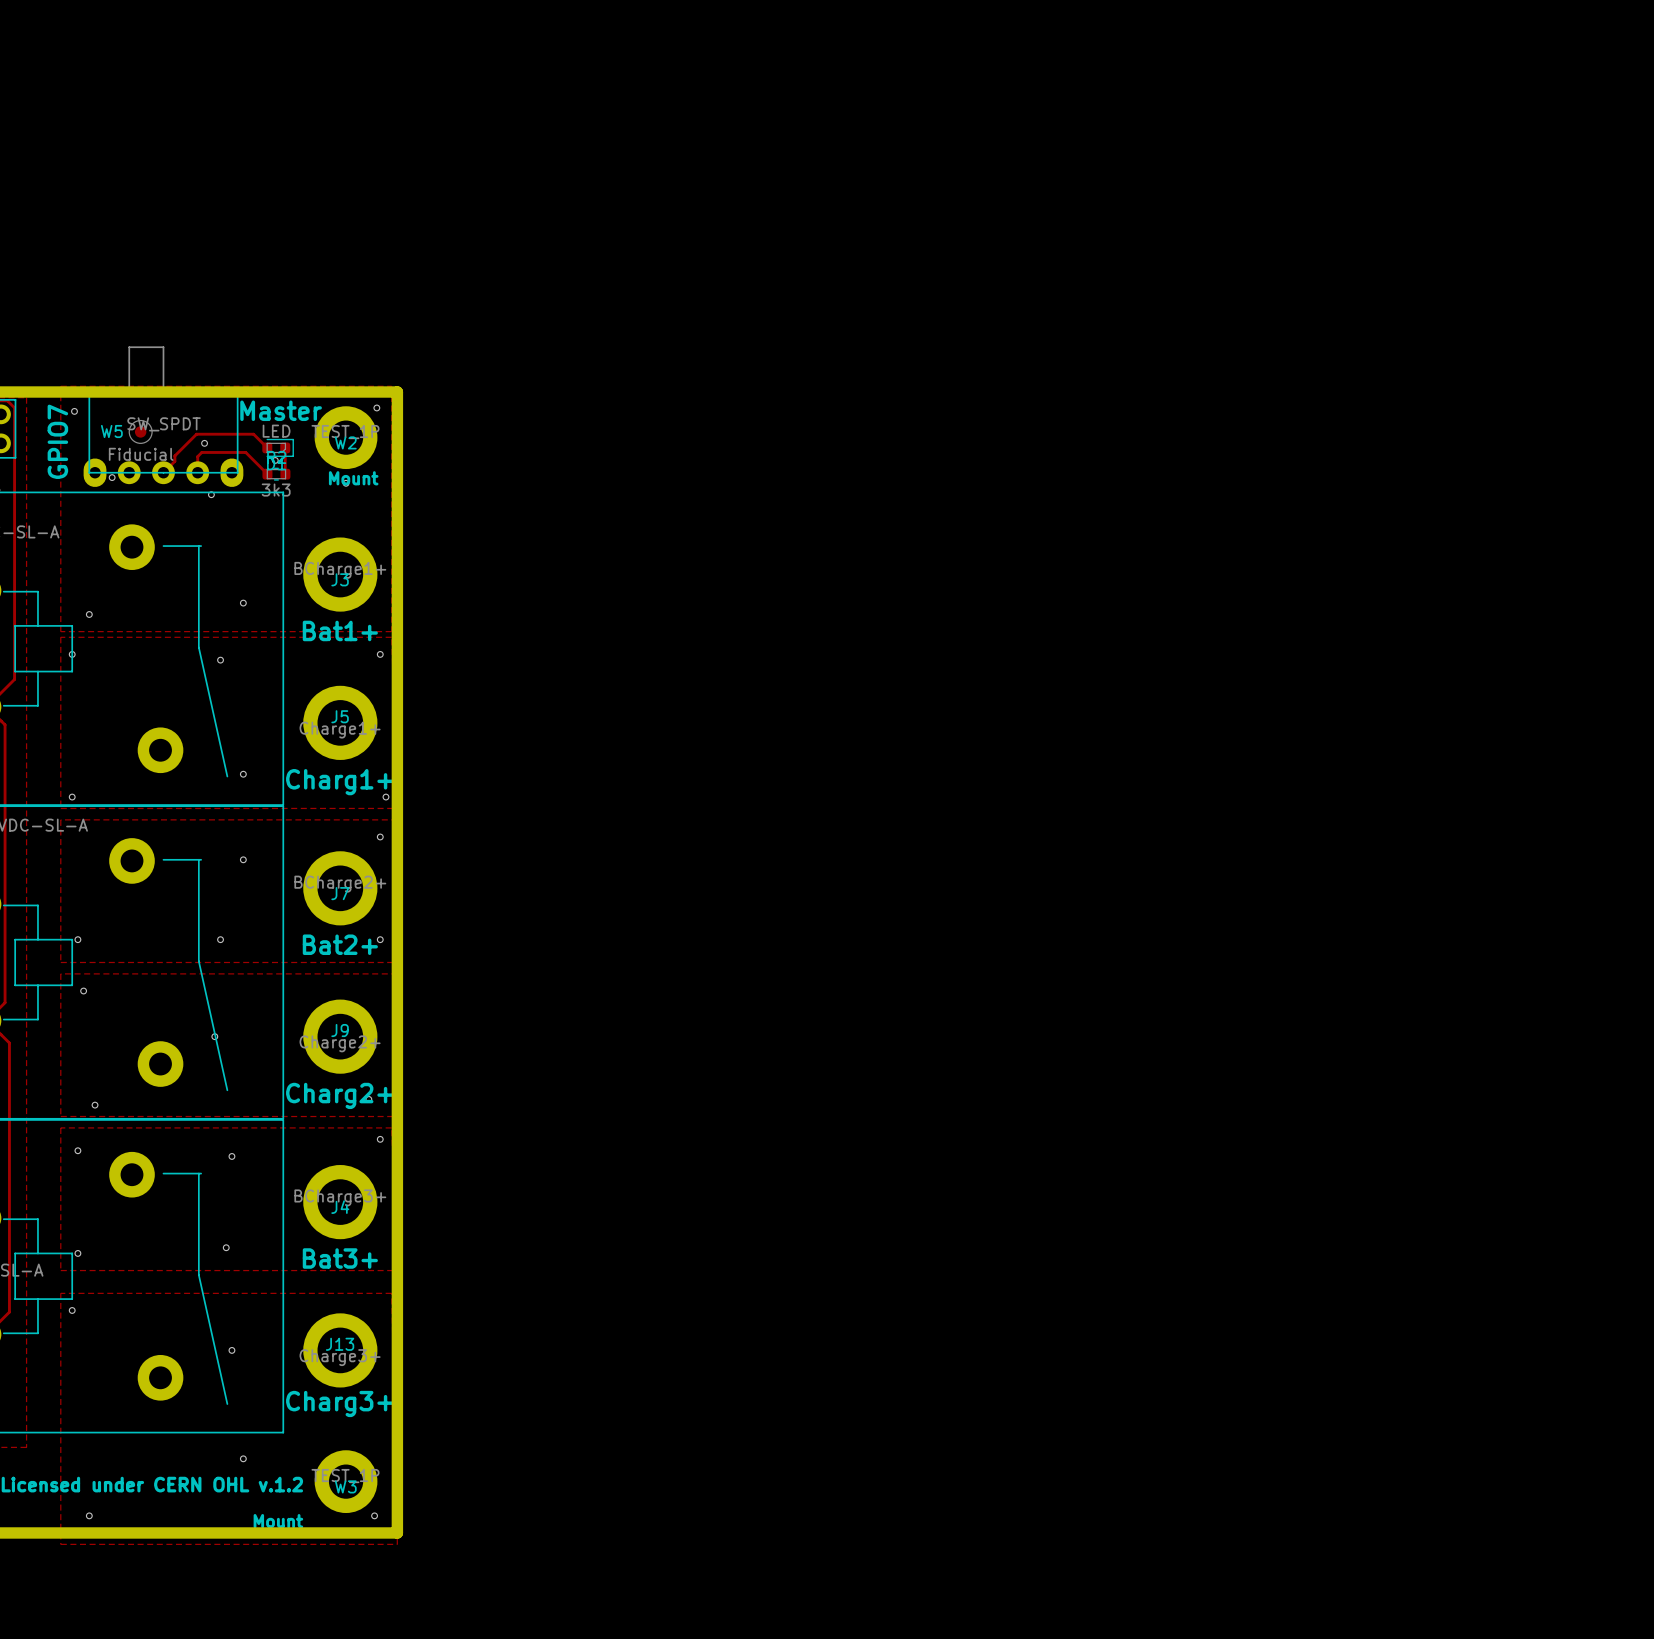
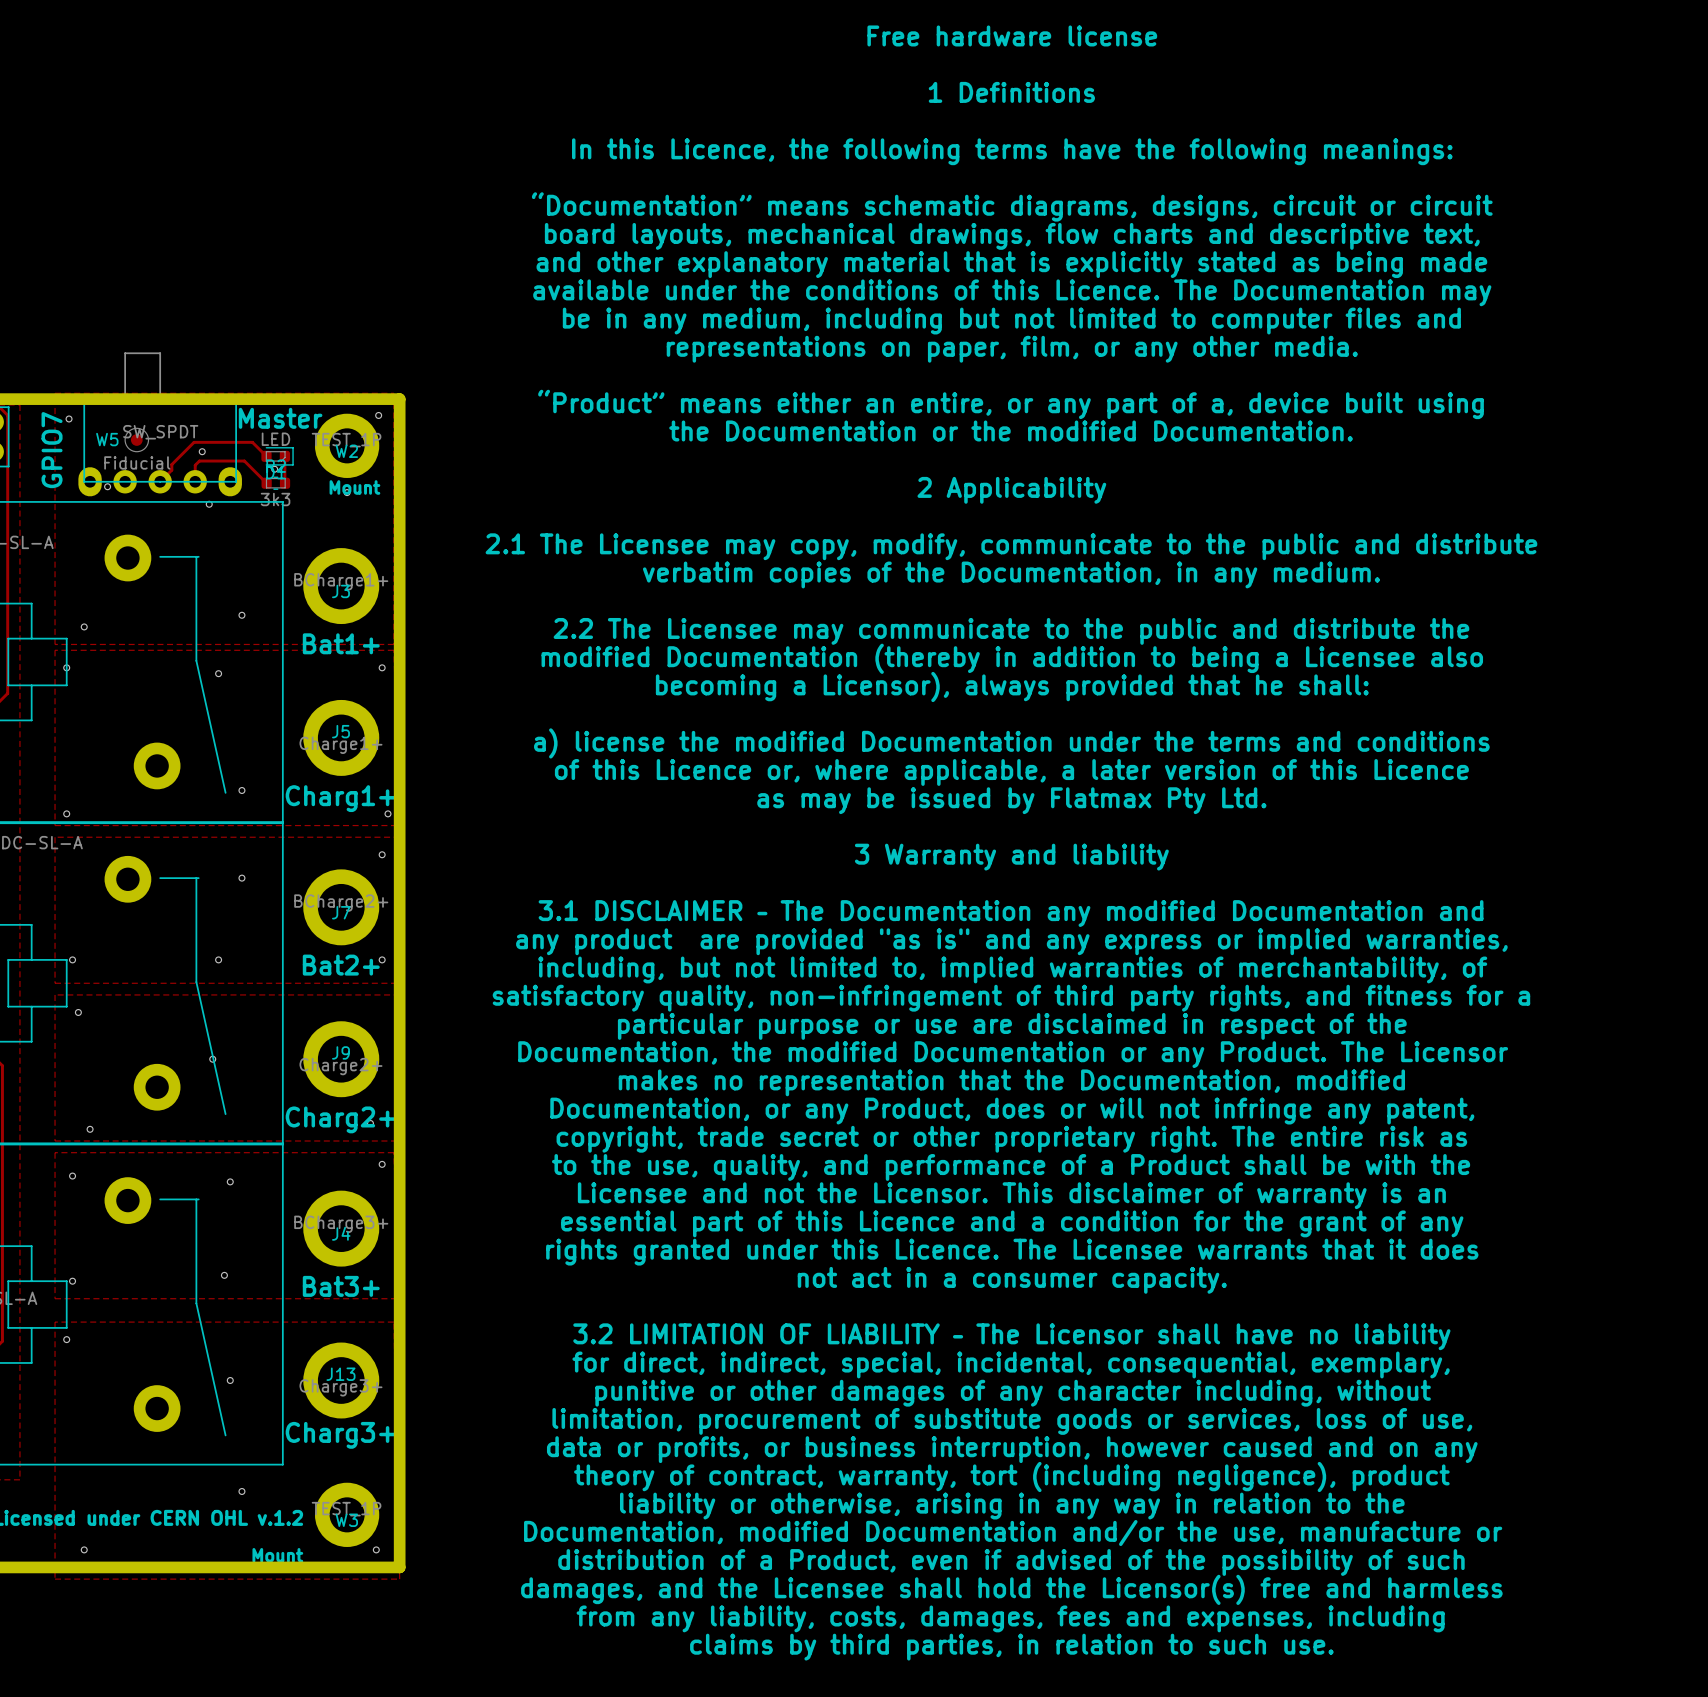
text: none -> Free hardware license (1012, 35)
text: none -> 1 Definitions (1011, 92)
text: none -> In this Licence, the following terms have the following meanings: (1012, 151)
text: none -> “Documentation” means schematic diagrams, designs, circuit or circuit (1012, 206)
text: none -> board layouts, mechanical drawings, flow charts and descriptive text, (1012, 236)
text: none -> and other explanatory material that is explicitly stated as being made (1011, 264)
text: none -> available under the conditions of this Licence. The Documentation may (1012, 292)
text: none -> be in any medium, including but not limited to computer files and (1011, 321)
text: none -> representations on paper, film, or any other media. (1012, 349)
text: none -> “Product” means either an entire, or any part of a, device built using (1011, 404)
text: none -> the Documentation or the modified Documentation. (1011, 430)
text: none -> 2 Applicability (1011, 490)
text: none -> 2.1 The Licensee may copy, modify, communicate to the public and distribute (1011, 546)
text: none -> verbatim copies of the Documentation, in any medium. (1011, 574)
text: none -> 2.2 The Licensee may communicate to the public and distribute the (1011, 631)
text: none -> modified Documentation (thereby in addition to being a Licensee also (1012, 658)
text: none -> becoming a Licensor), always provided that he shall: (1012, 686)
text: none -> a) license the modified Documentation under the terms and conditions (1011, 743)
text: none -> of this Licence or, where applicable, a later version of this Licence (1011, 772)
text: none -> as may be issued by Flatmax Pty Ltd. (1011, 800)
text: none -> 3 Warranty and liability (1011, 857)
text: none -> 3.1 DISCLAIMER – The Documentation any modified Documentation and (1011, 913)
text: none -> any product are provided "as is" and any express or implied warranties, (1011, 941)
text: none -> including, but not limited to, implied warranties of merchantability, of (1012, 969)
text: none -> satisfactory quality, non-infringement of third party rights, and fitness for a (1011, 998)
text: none -> particular purpose or use are disclaimed in respect of the (1012, 1026)
text: none -> Documentation, the modified Documentation or any Product. The Licensor (1013, 1054)
text: none -> makes no representation that the Documentation, modified (1011, 1082)
text: none -> Documentation, or any Product, does or will not infringe any patent, (1012, 1111)
text: none -> copyright, trade secret or other proprietary right. The entire risk as (1011, 1139)
text: none -> to the use, quality, and performance of a Product shall be with the (1011, 1167)
text: none -> Licensee and not the Licensor. This disclaimer of warranty is an (1011, 1195)
text: none -> essential part of this Licence and a condition for the grant of any (1012, 1223)
text: none -> rights granted under this Licence. The Licensee warrants that it does (1012, 1252)
text: none -> not act in a consumer capacity. (1012, 1280)
text: none -> 3.2 LIMITATION OF LIABILITY – The Licensor shall have no liability (1011, 1336)
text: none -> for direct, indirect, special, incidental, consequential, exemplary, (1011, 1364)
text: none -> punitive or other damages of any character including, without (1013, 1393)
text: none -> limitation, procurement of substitute goods or services, loss of use, (1012, 1421)
text: none -> data or profits, or business interruption, however caused and on any (1012, 1449)
text: none -> theory of contract, warranty, tort (including negligence), product (1011, 1477)
text: none -> liability or otherwise, arising in any way in relation to the (1012, 1506)
text: none -> Documentation, modified Documentation and/or the use, manufacture or (1013, 1533)
text: none -> distribution of a Product, even if advised of the possibility of such (1011, 1562)
text: none -> damages, and the Licensee shall hold the Licensor(s) free and harmless (1011, 1589)
text: none -> from any liability, costs, damages, fees and expenses, including (1010, 1618)
text: none -> claims by third parties, in relation to such use. (1011, 1647)

